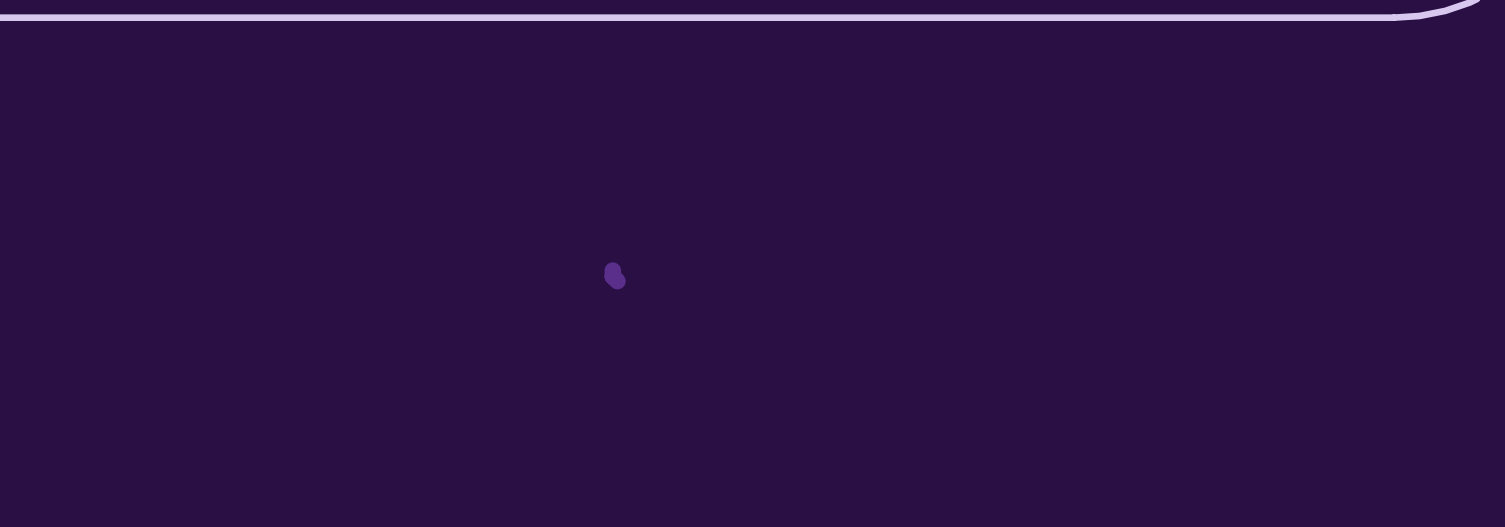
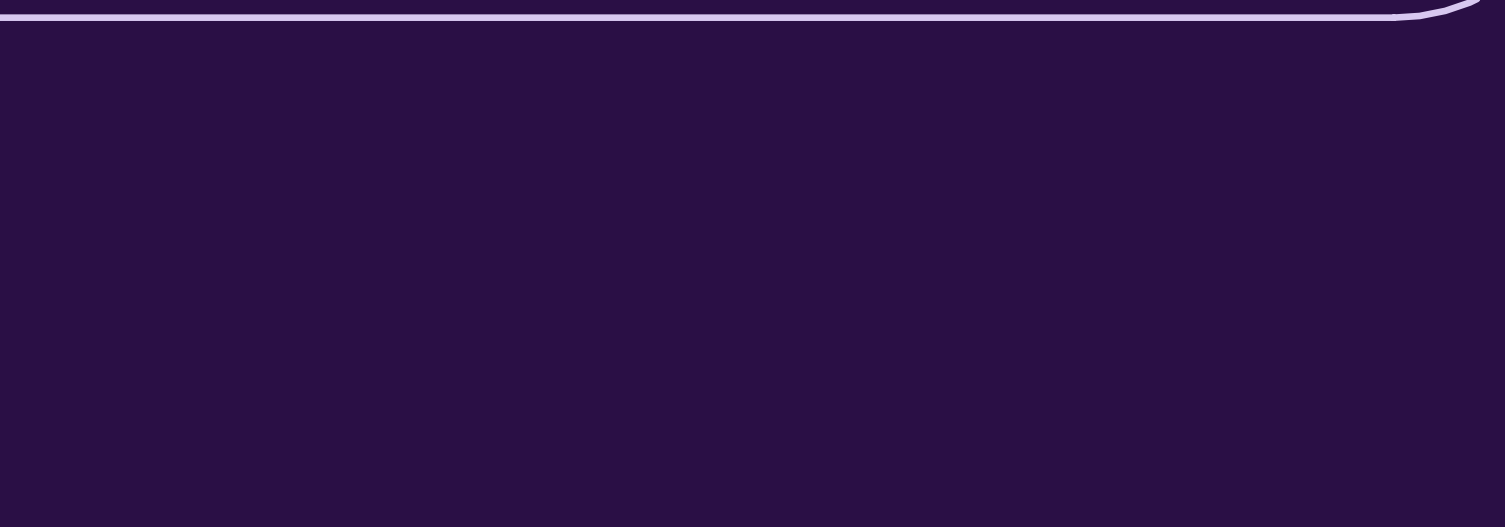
track: (612, 270) (612, 276) (617, 281) -> none

